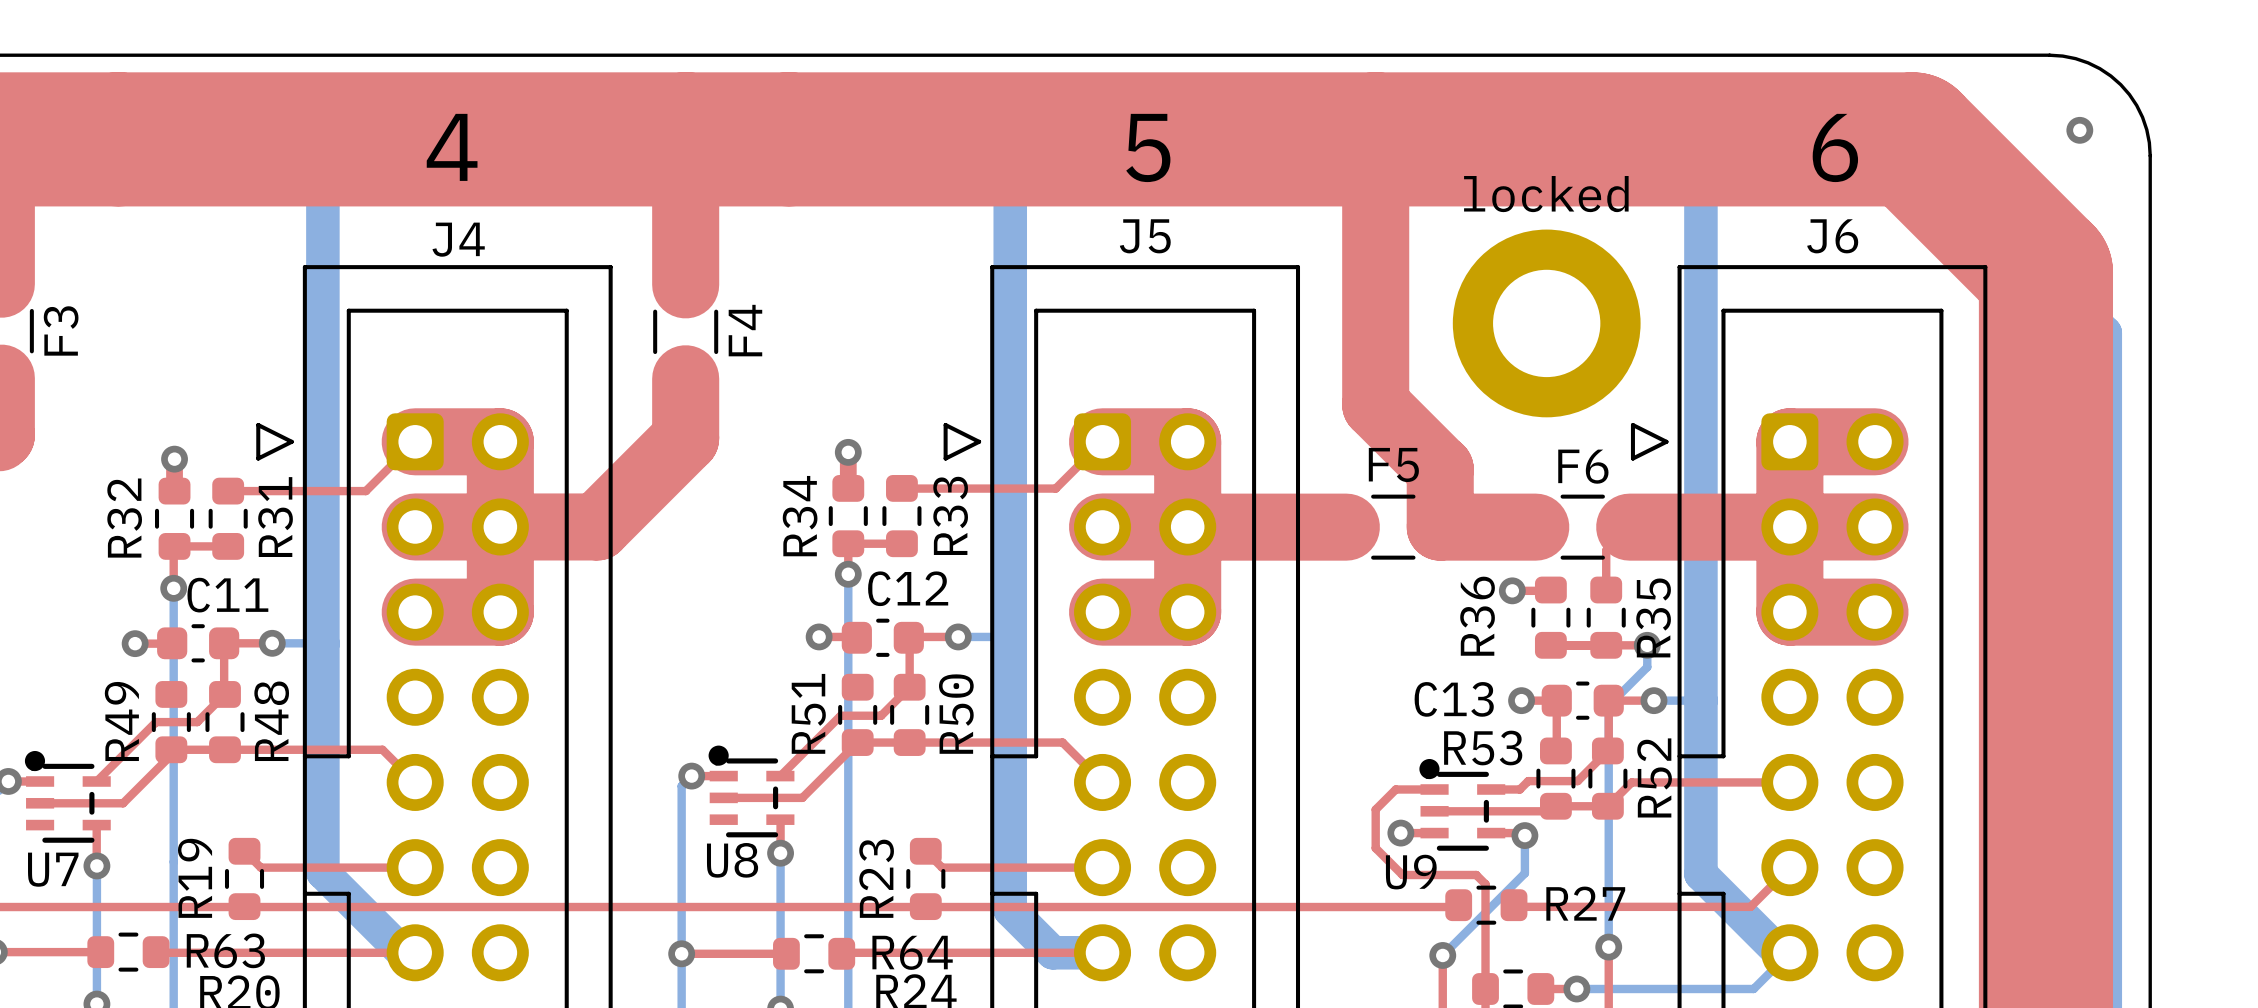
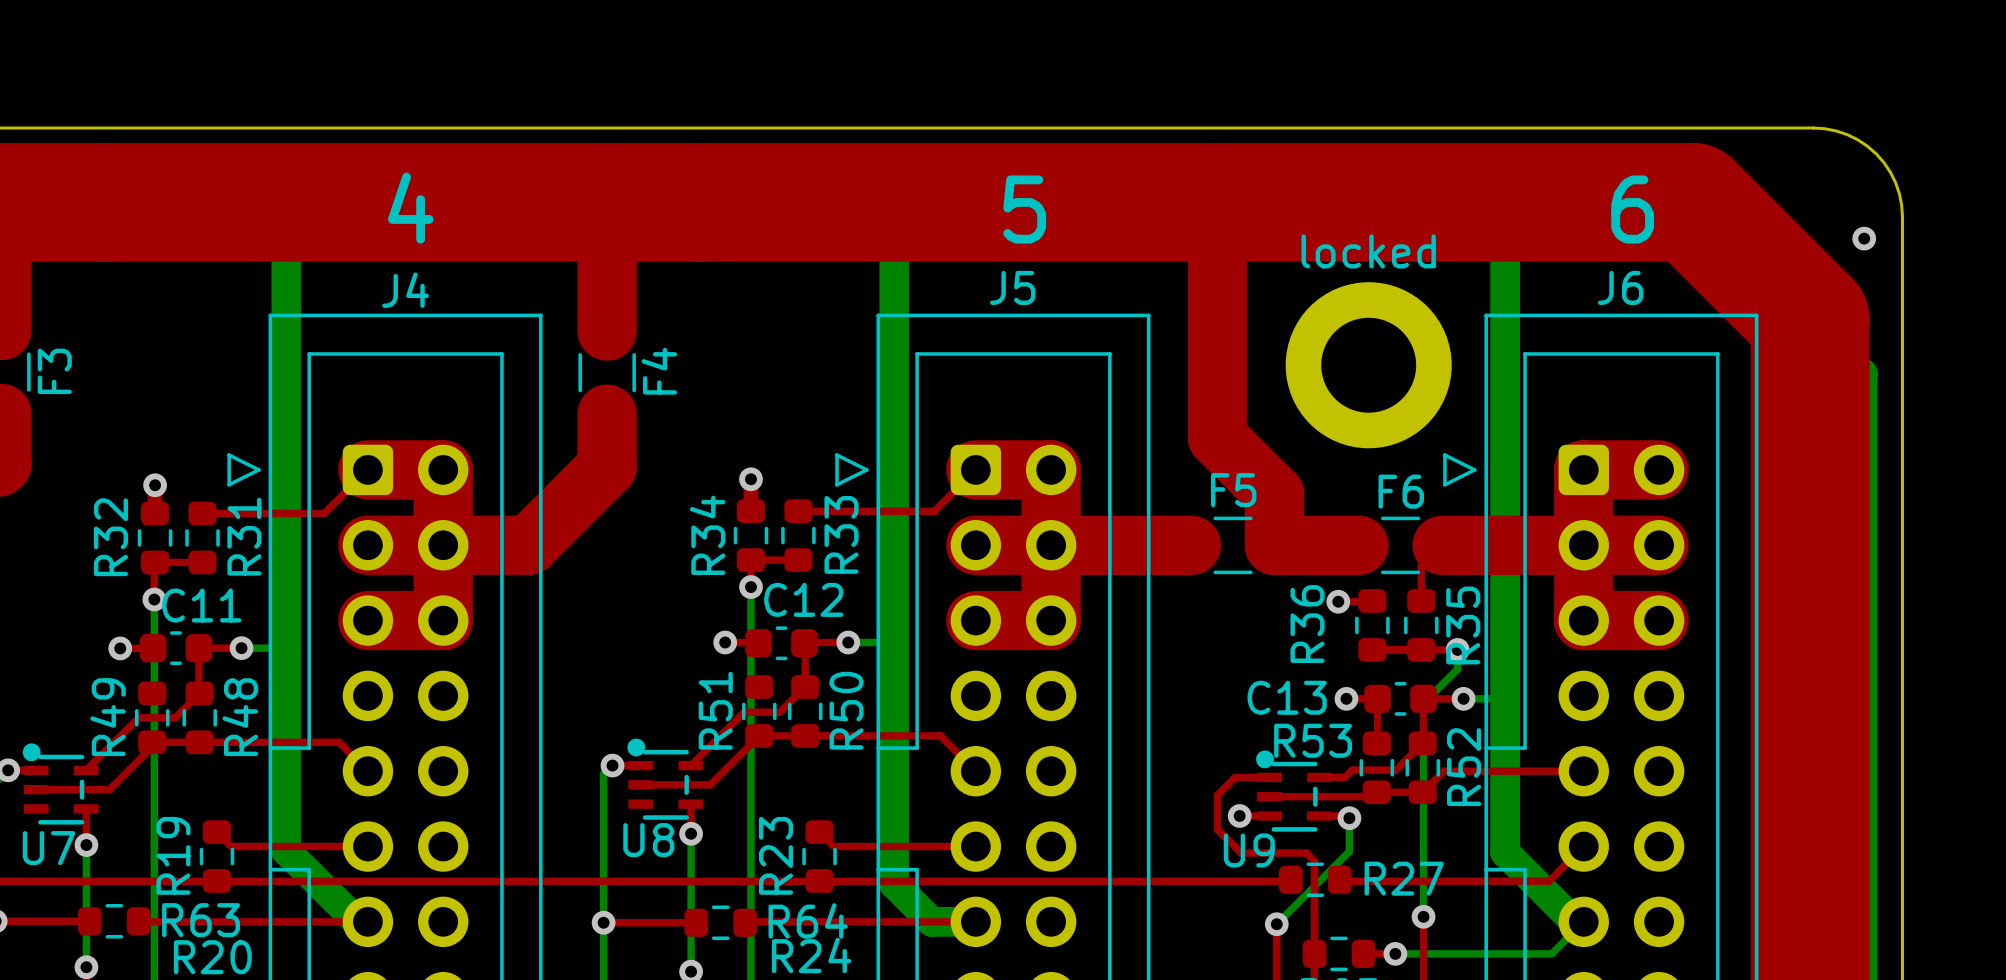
via position: (2079, 130) -> (1864, 238)

